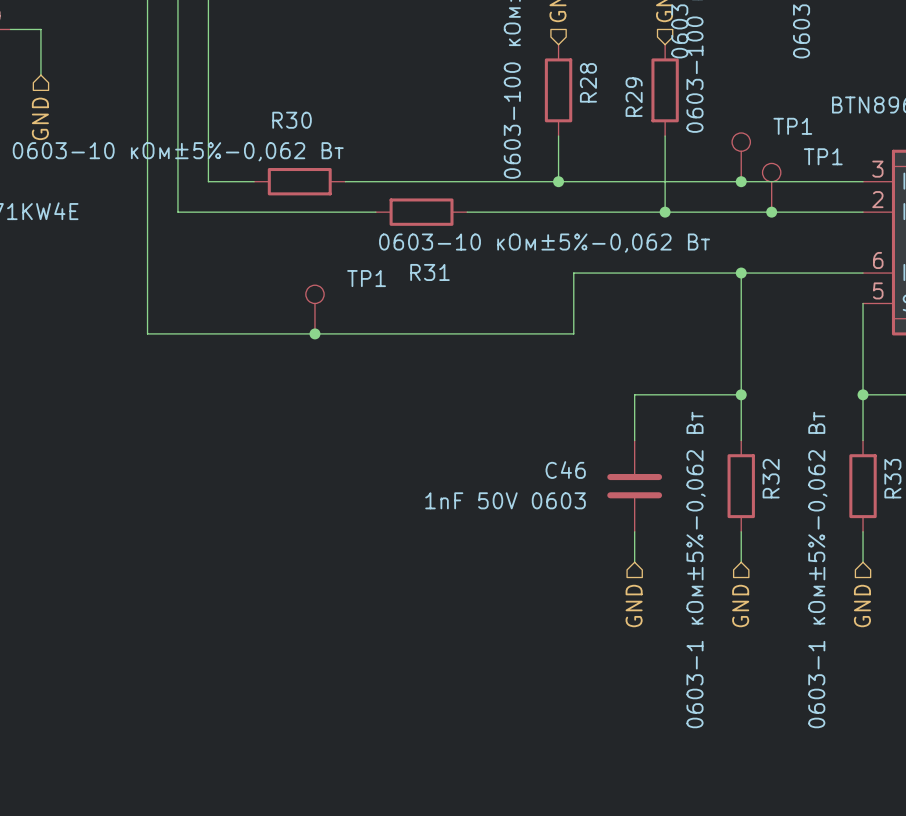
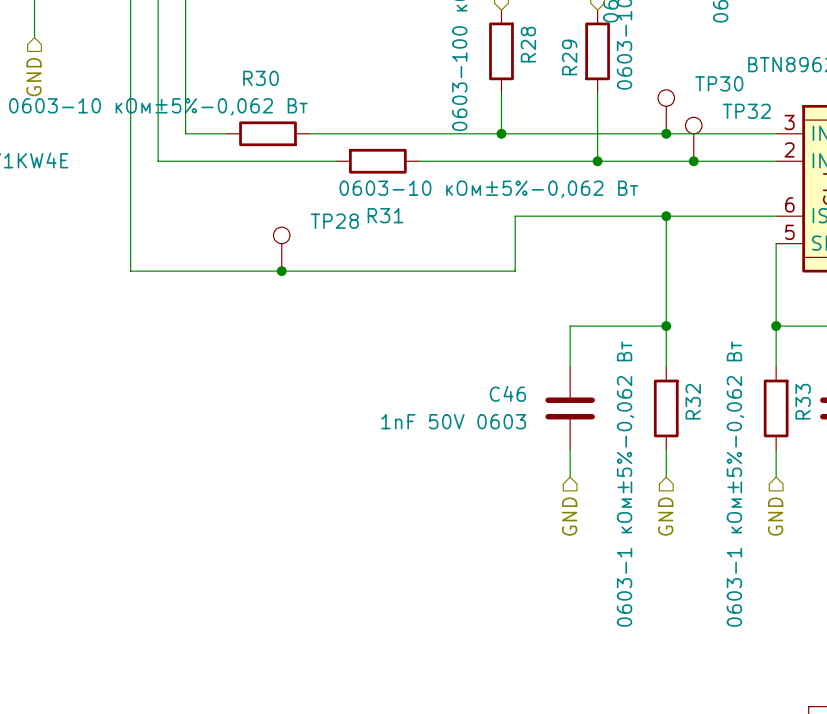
TP1 name: TP1 (792, 126) -> TP30 (719, 83)
TP1 name: TP1 (823, 156) -> TP32 (746, 111)
TP1 name: TP1 (366, 278) -> TP28 (334, 221)

